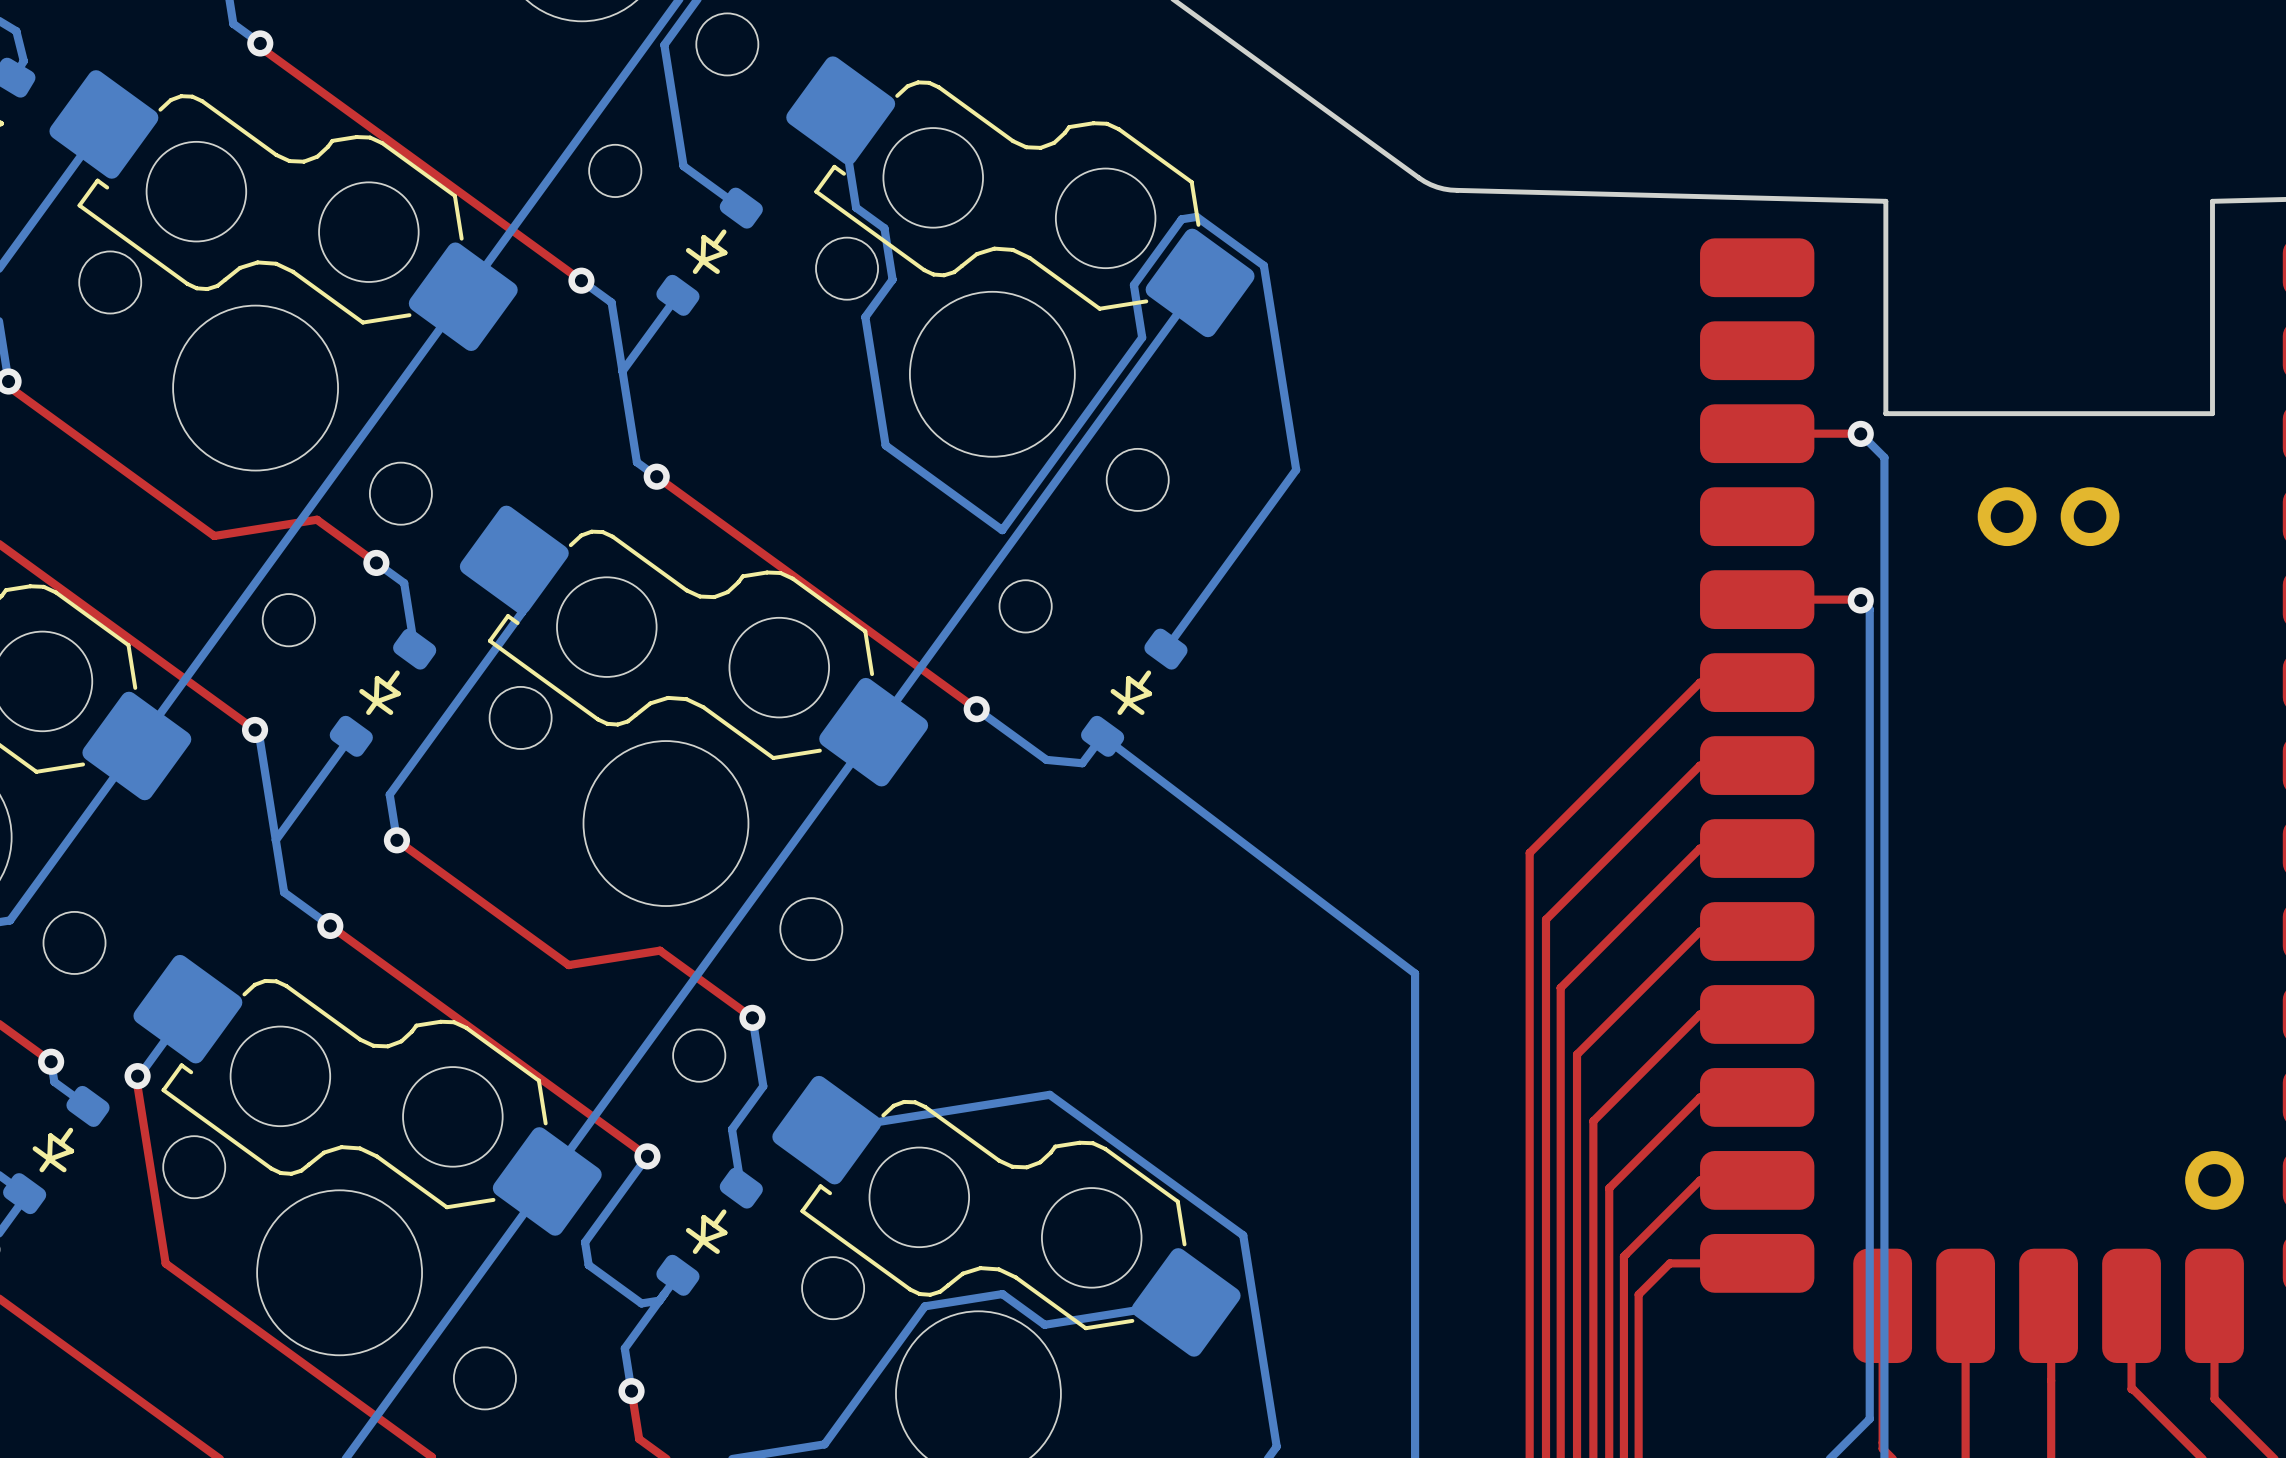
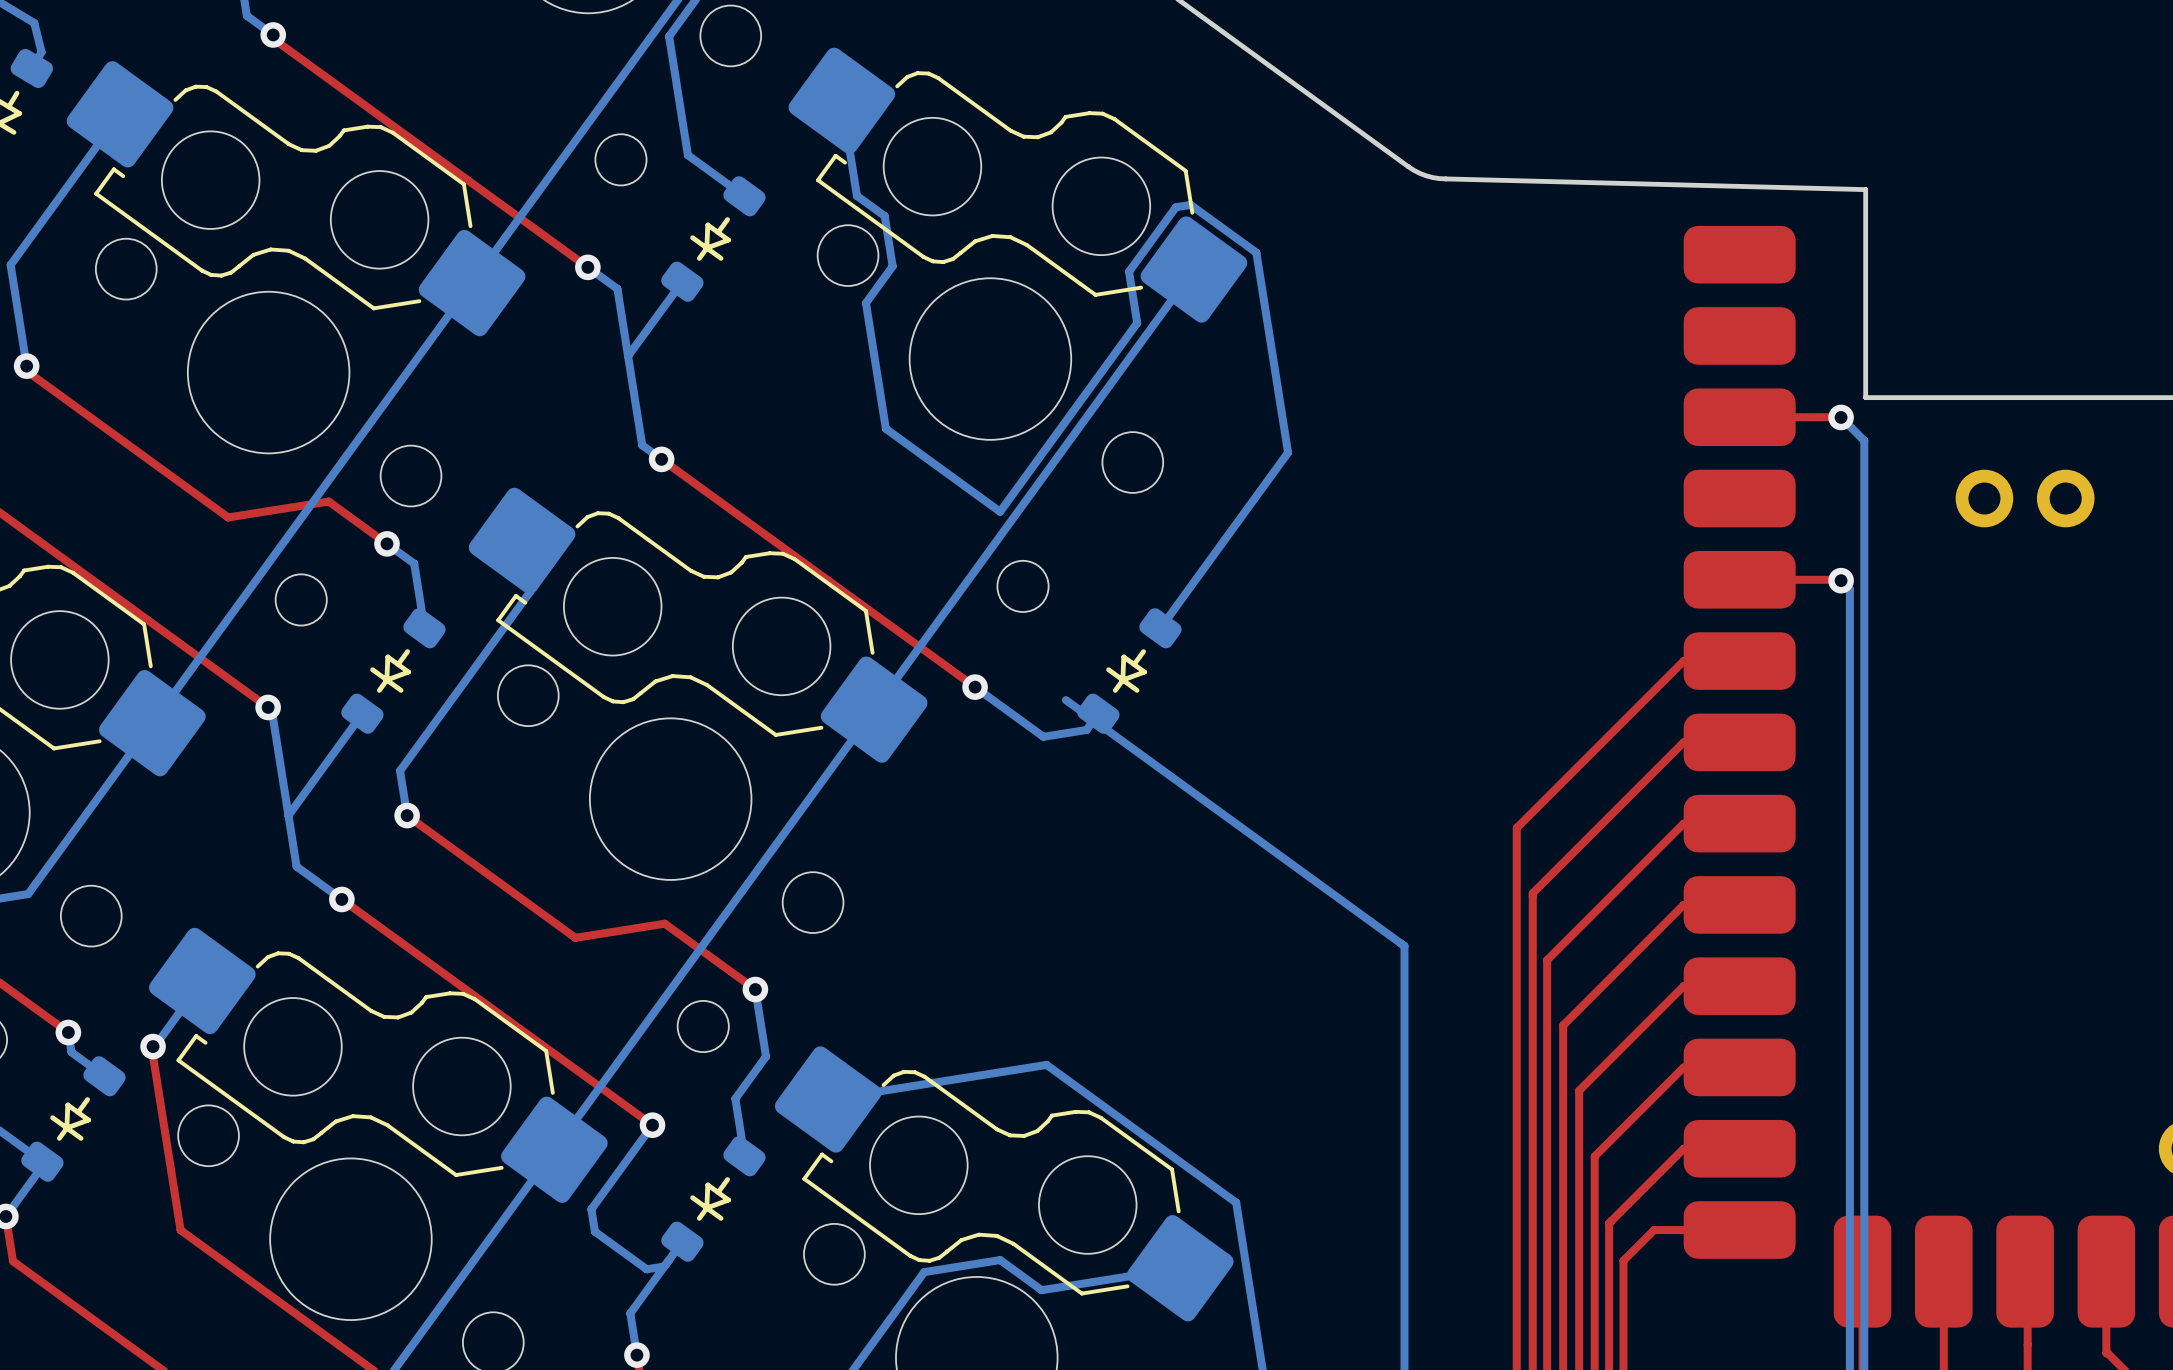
bottom track: none -> (1098, 713) (1086, 729) (1043, 736)
bottom track: (1046, 759) (1082, 763) (1102, 736) (1415, 973) -> (1065, 700) (1404, 946)

